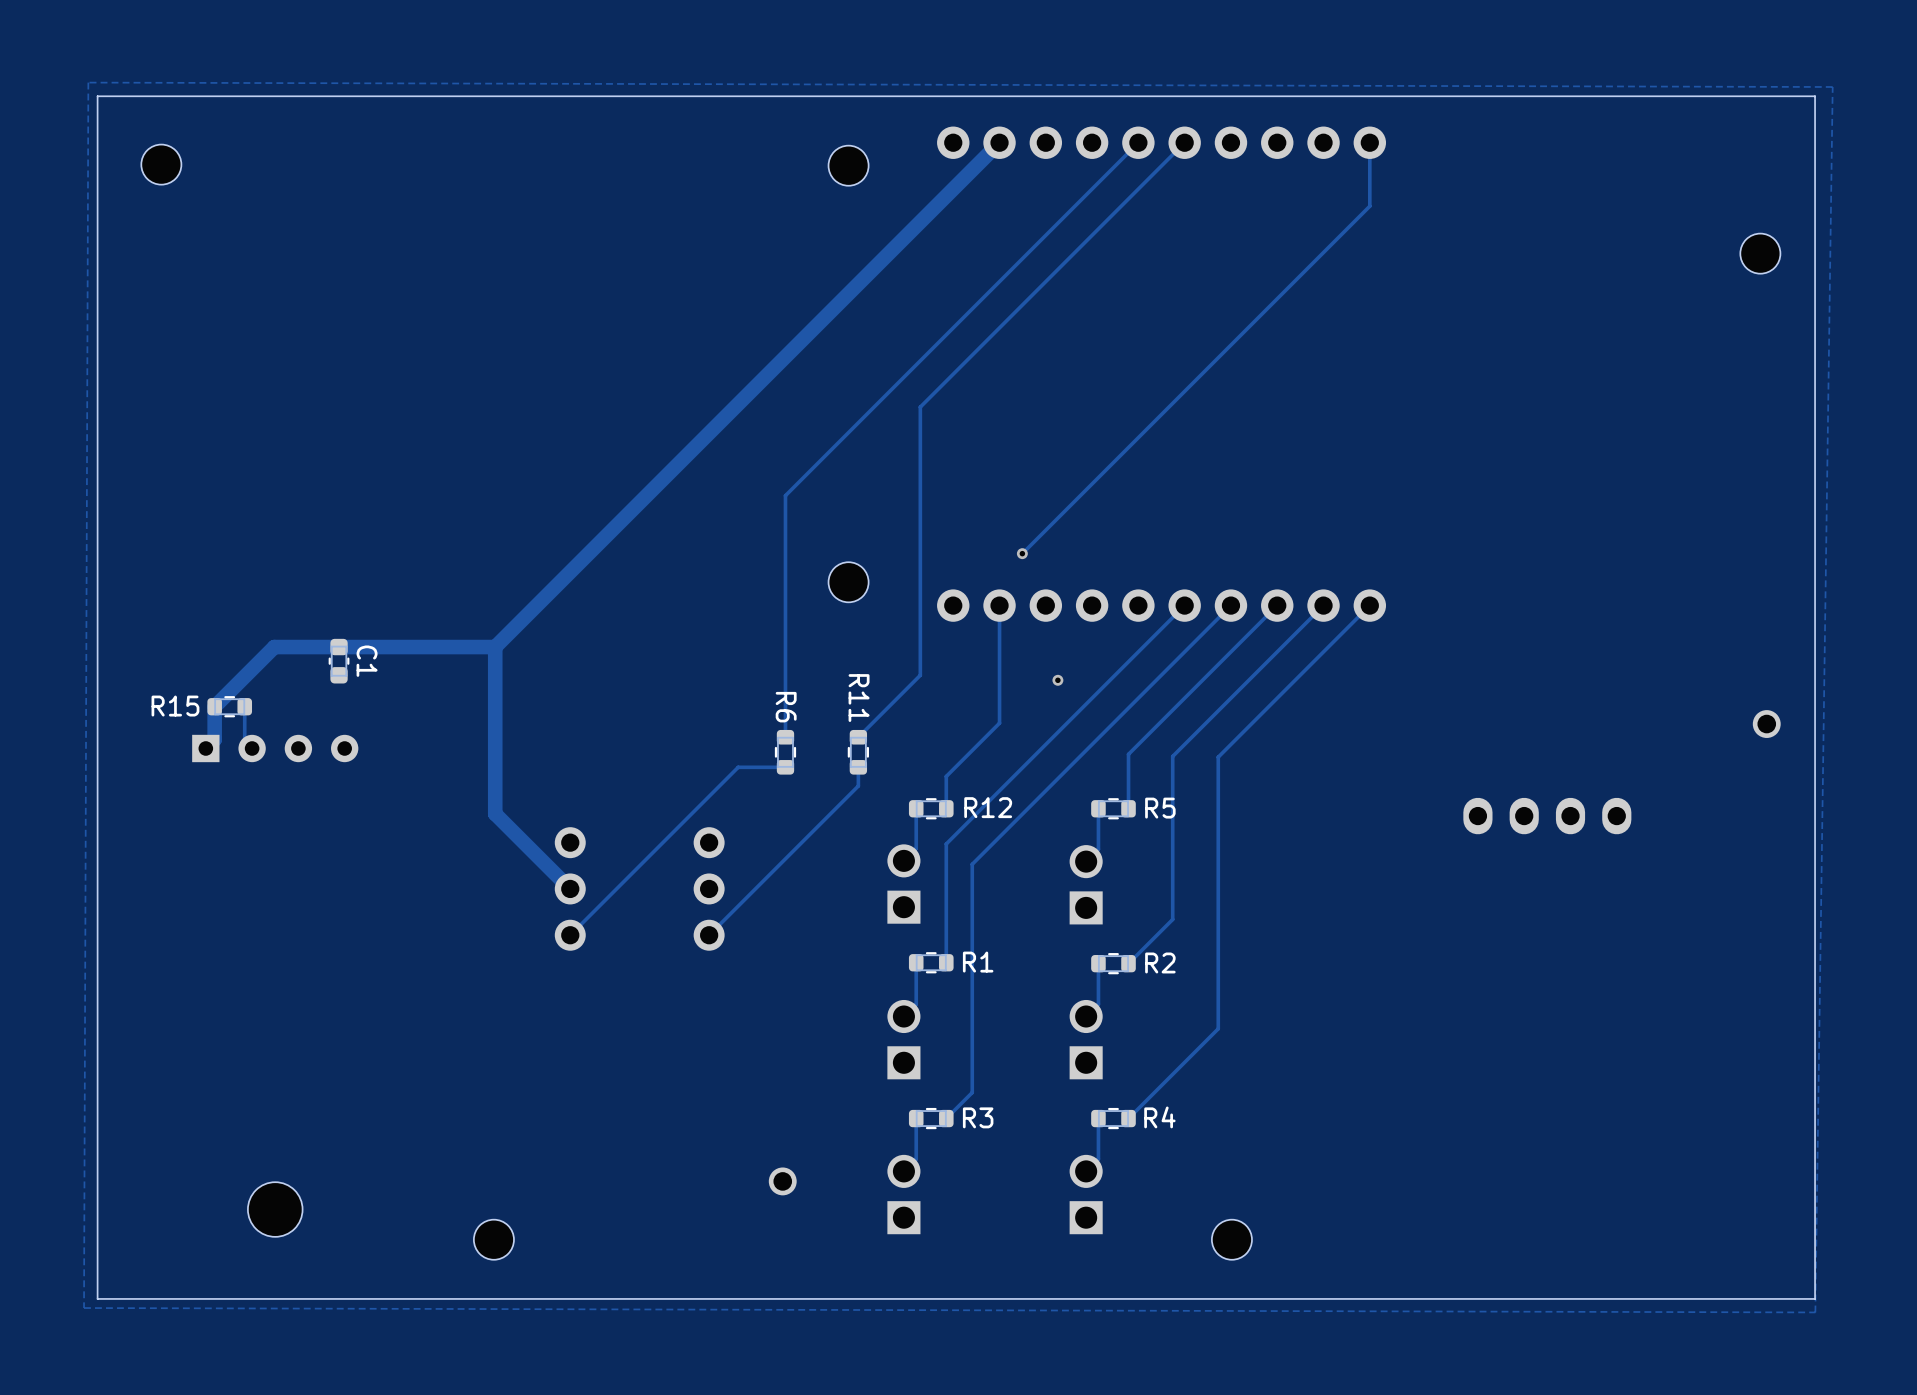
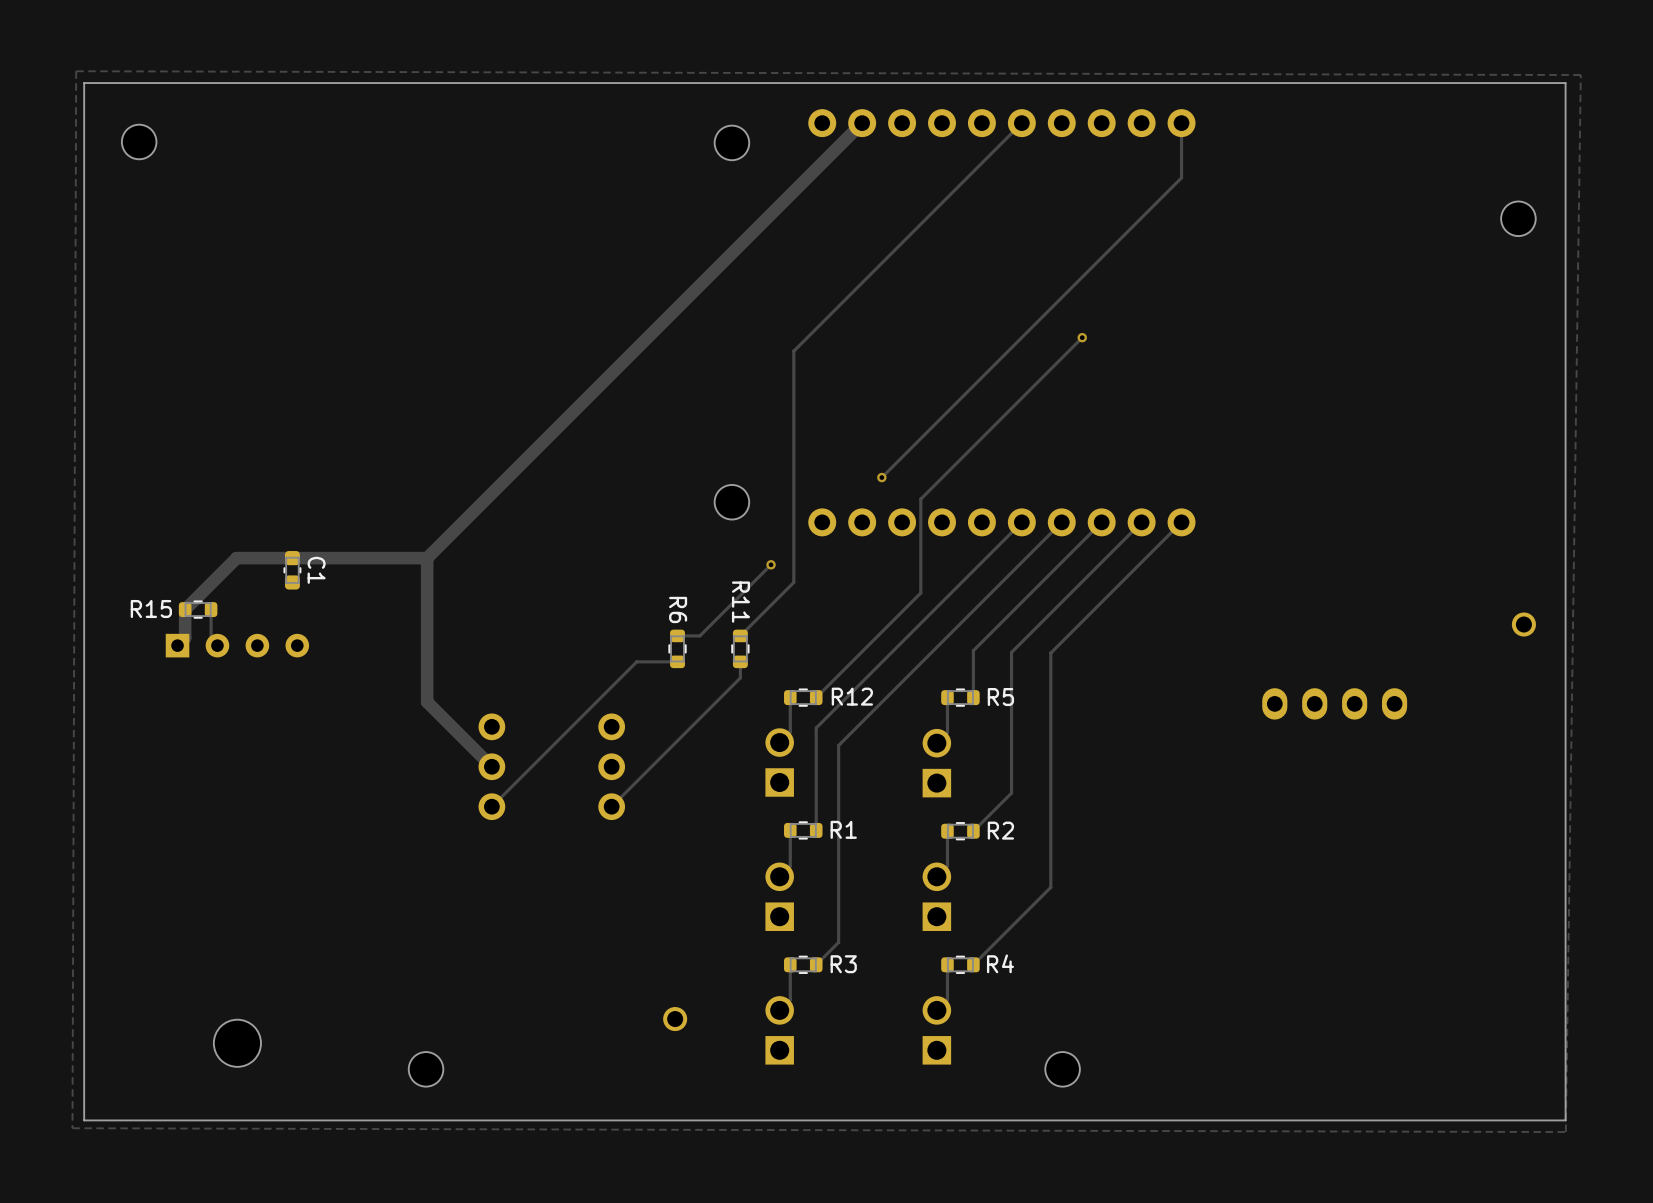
track: (1138, 142) (785, 495) (785, 737) -> (771, 564) (699, 635) (677, 635)
via: none -> (1082, 337)
track: (999, 605) (999, 723) (946, 776) (946, 808) -> (1082, 337) (920, 499) (920, 593) (816, 697)
via: none -> (771, 564)
via: (1057, 680) -> none

